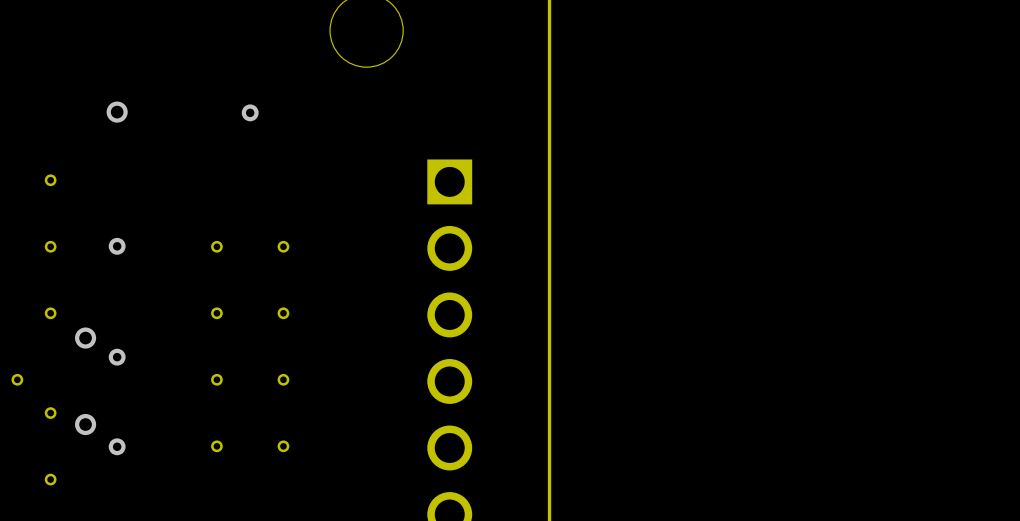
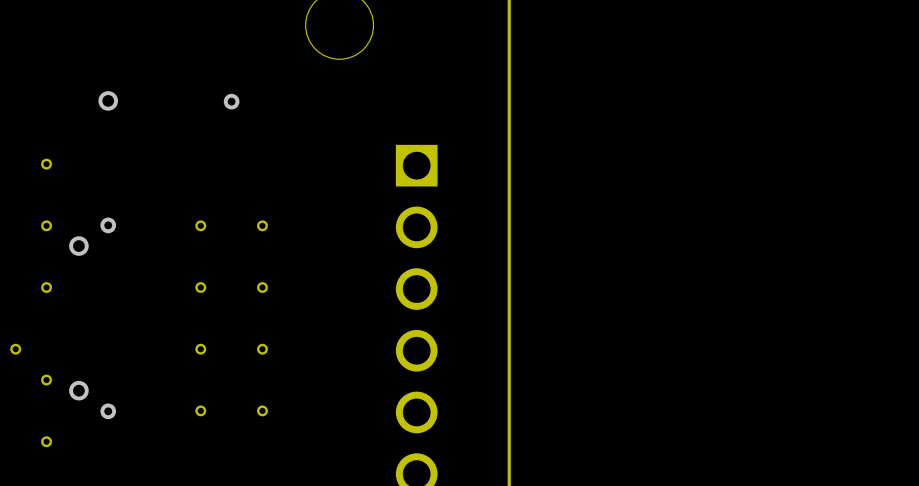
via position: (85, 338) -> (78, 246)
via: (117, 357) -> none

